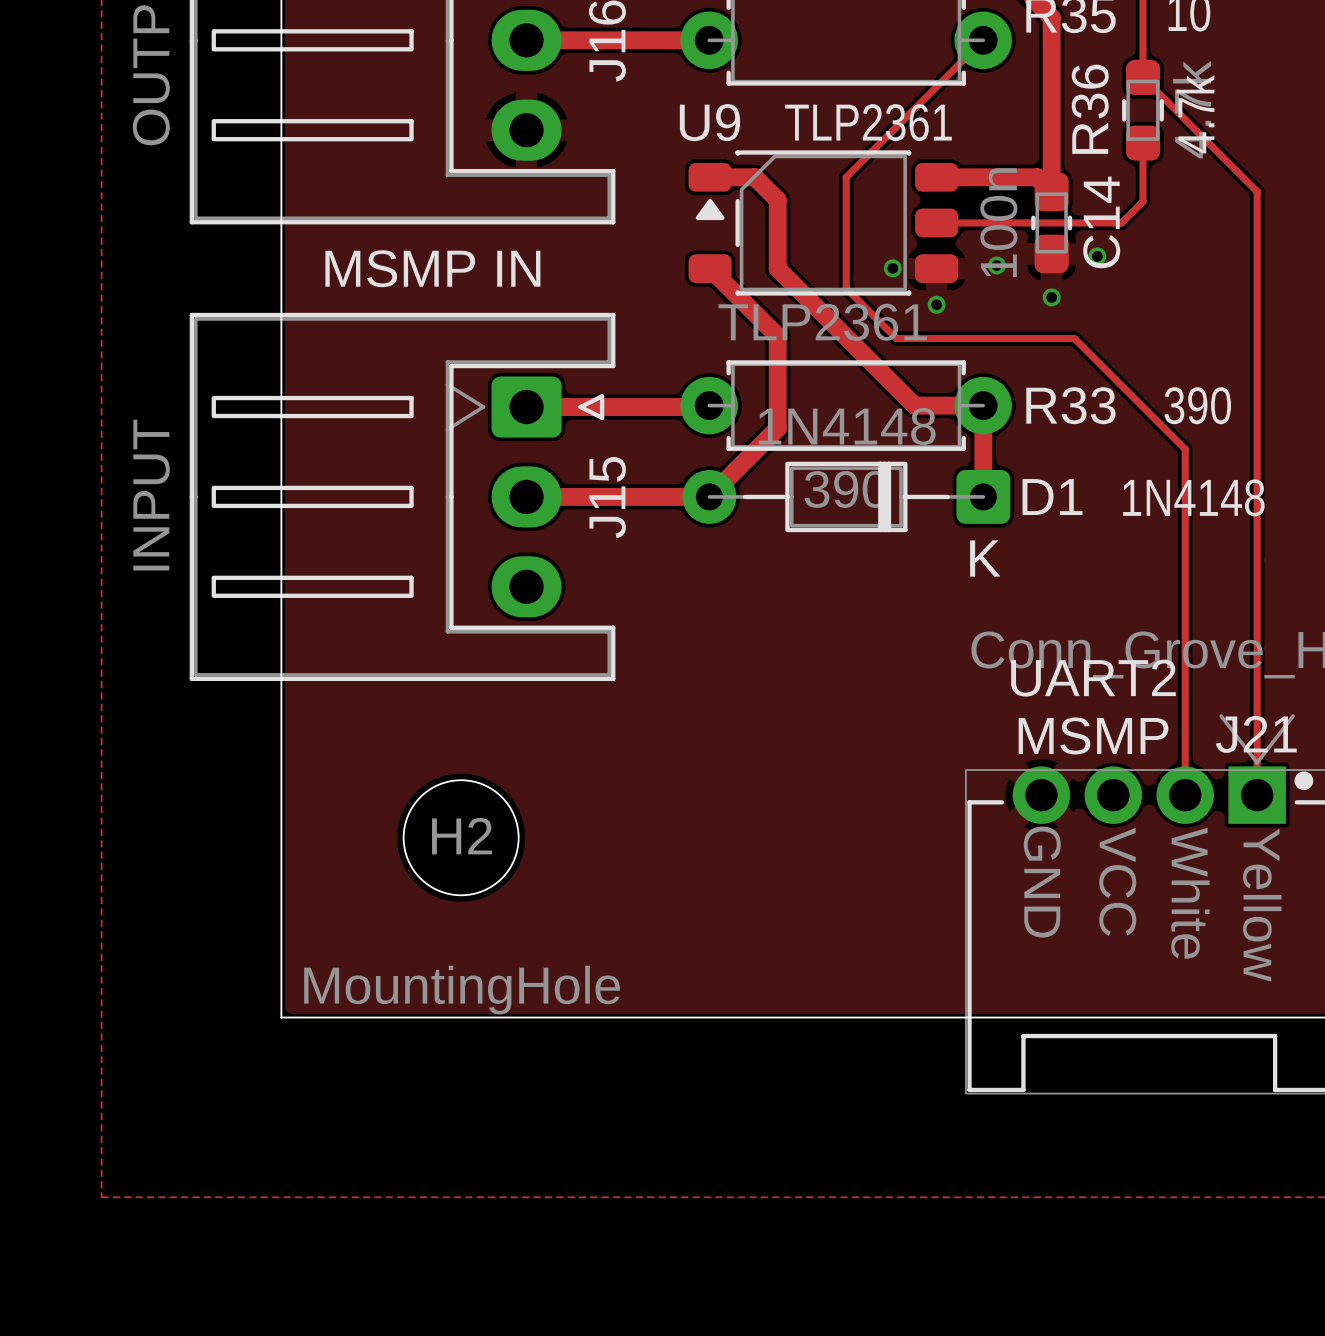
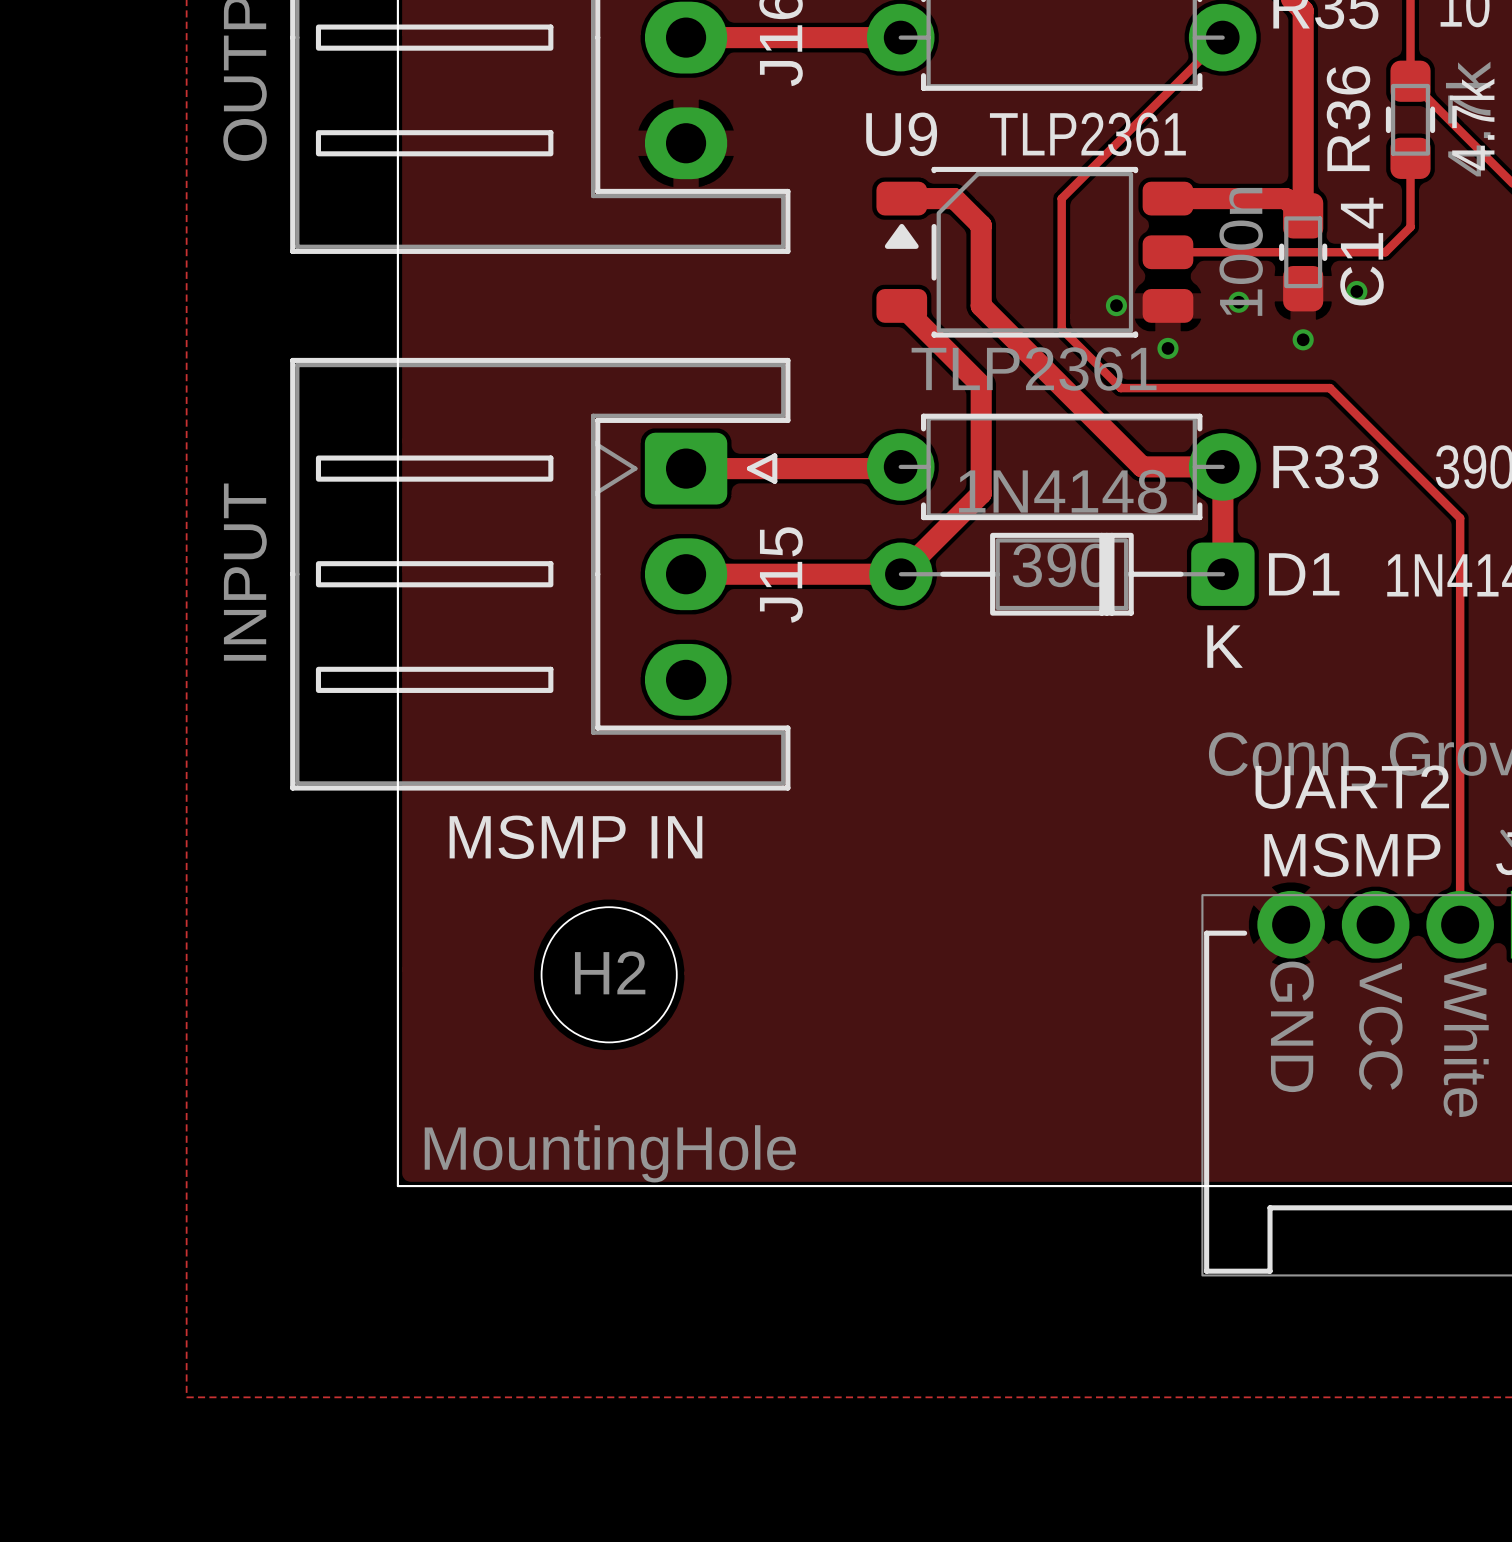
text position: MSMP IN (432, 268) -> MSMP IN (575, 837)

